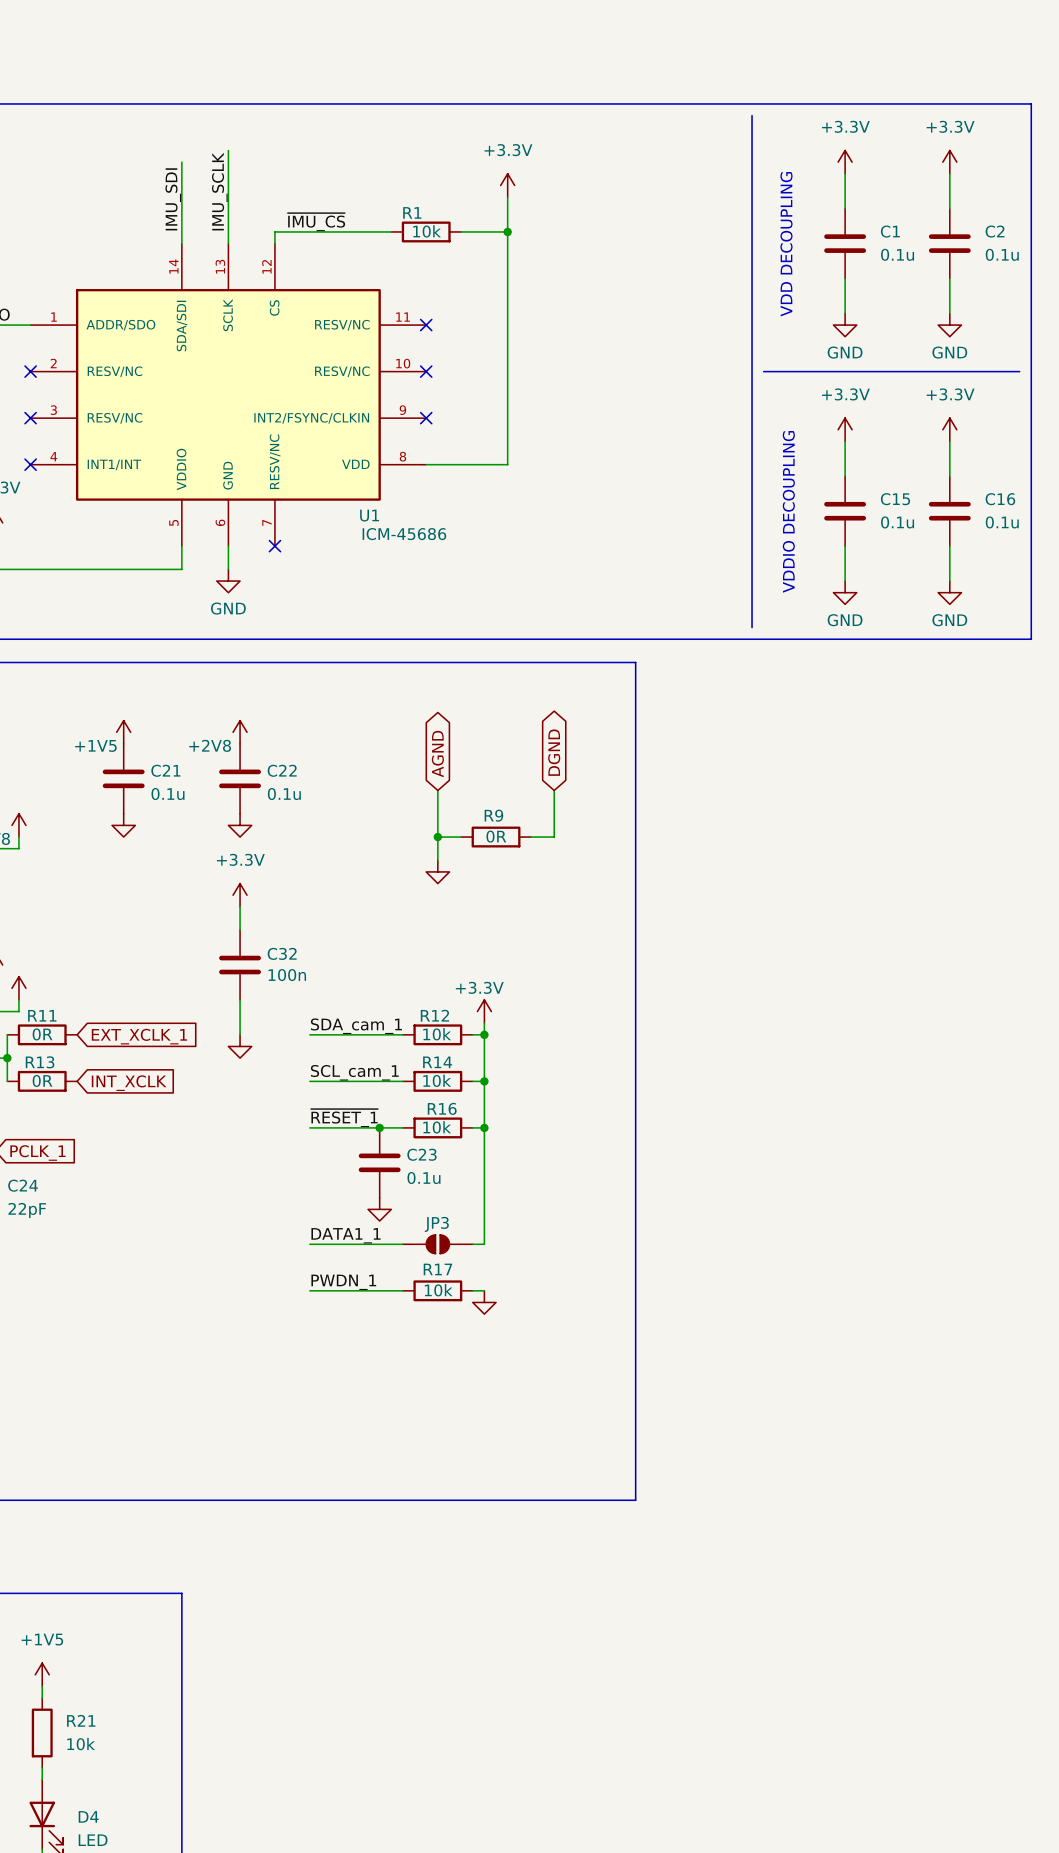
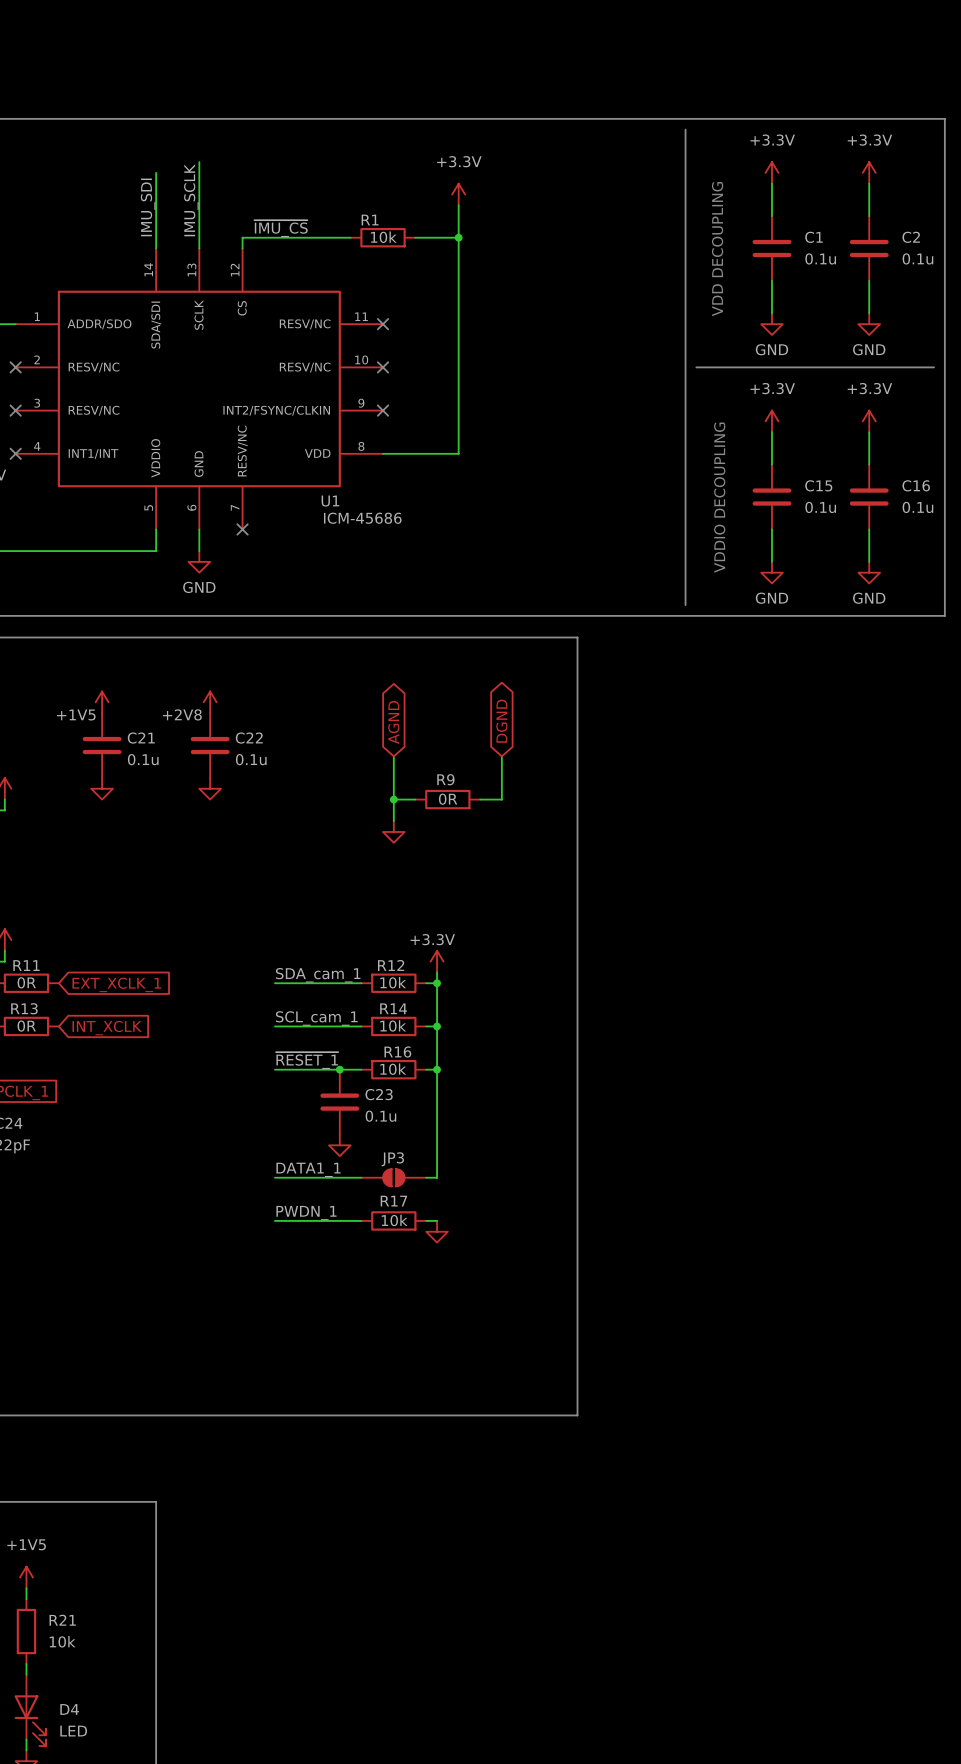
power symbol: +3.3V (240, 895) -> none
wire: (240, 906) (240, 930) -> none
C32: 100n (240, 965) -> none
wire: (240, 999) (240, 1034) -> none
power symbol: (240, 1046) -> none

